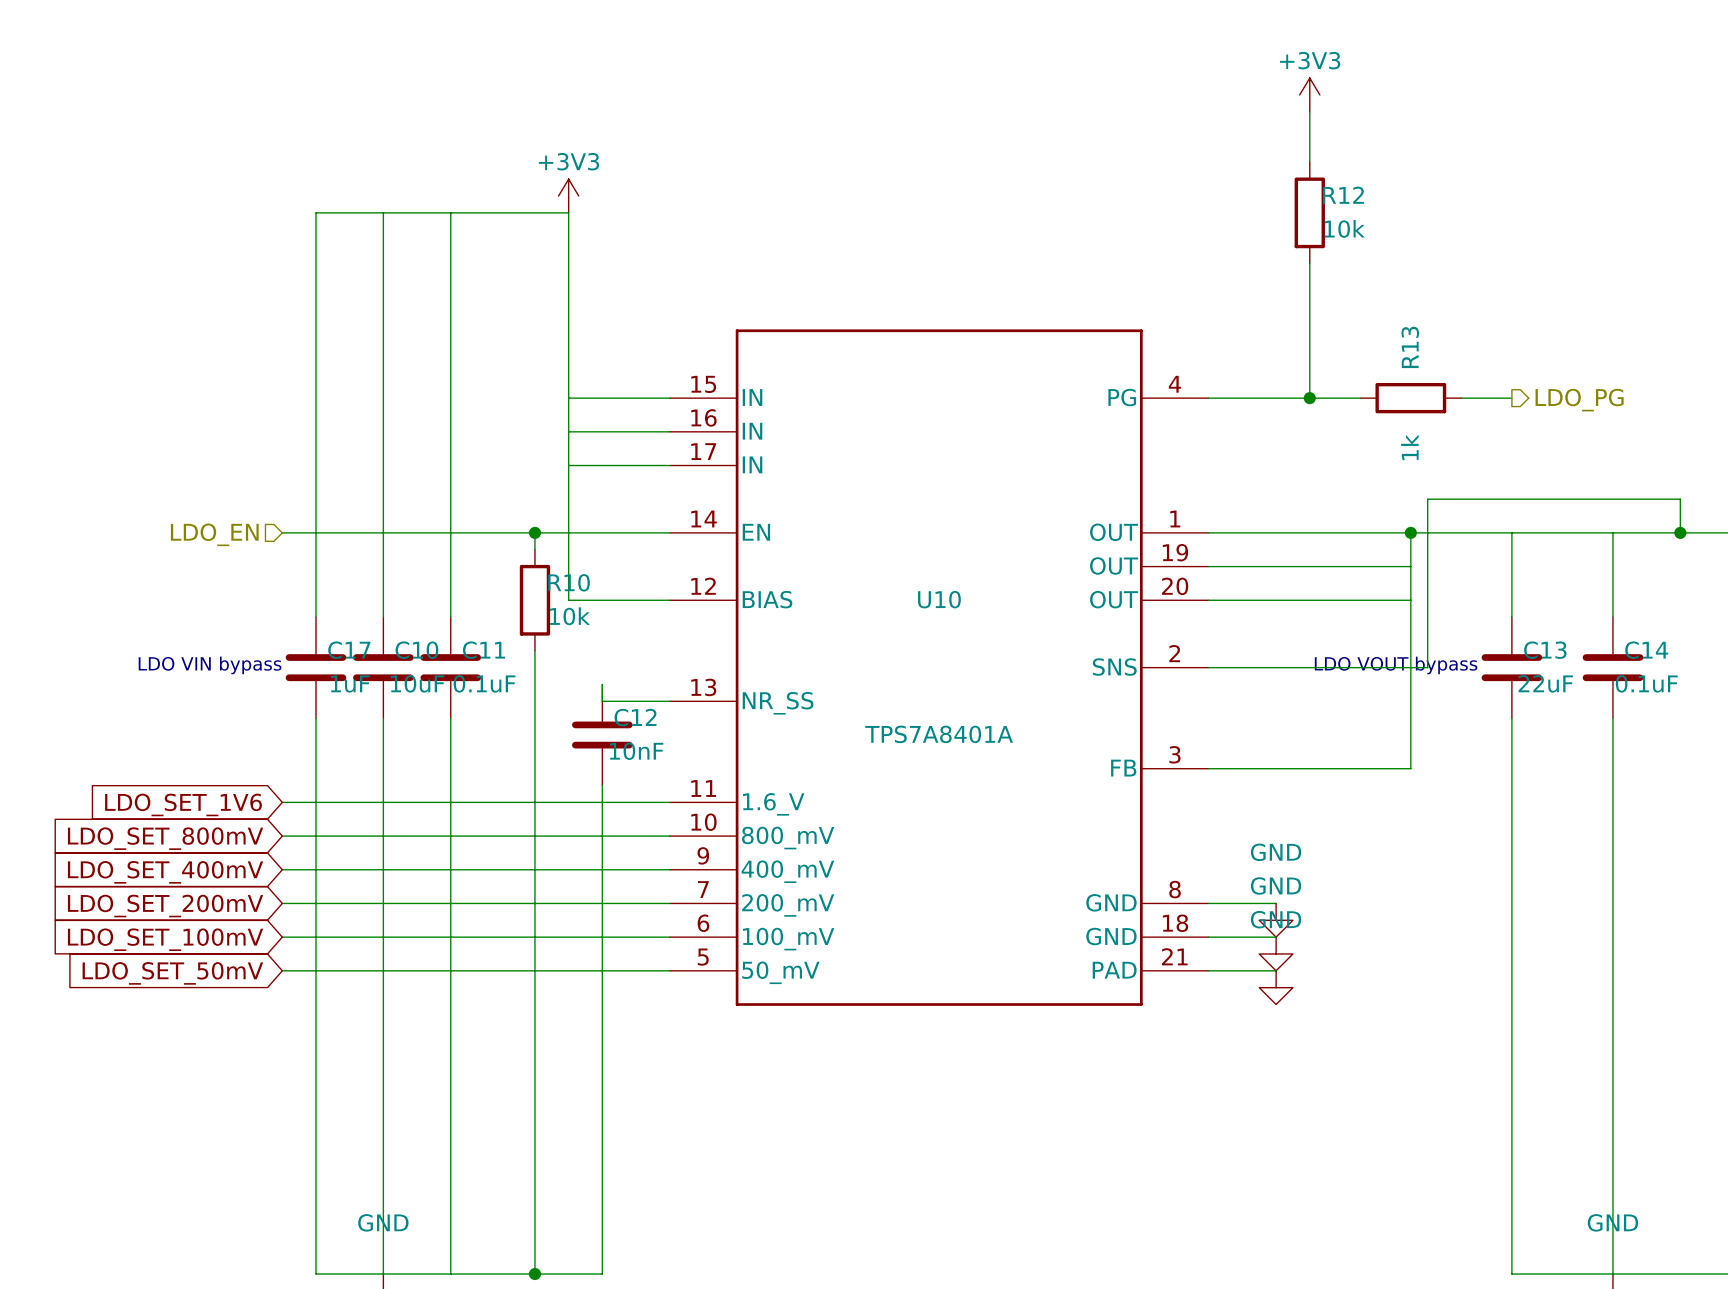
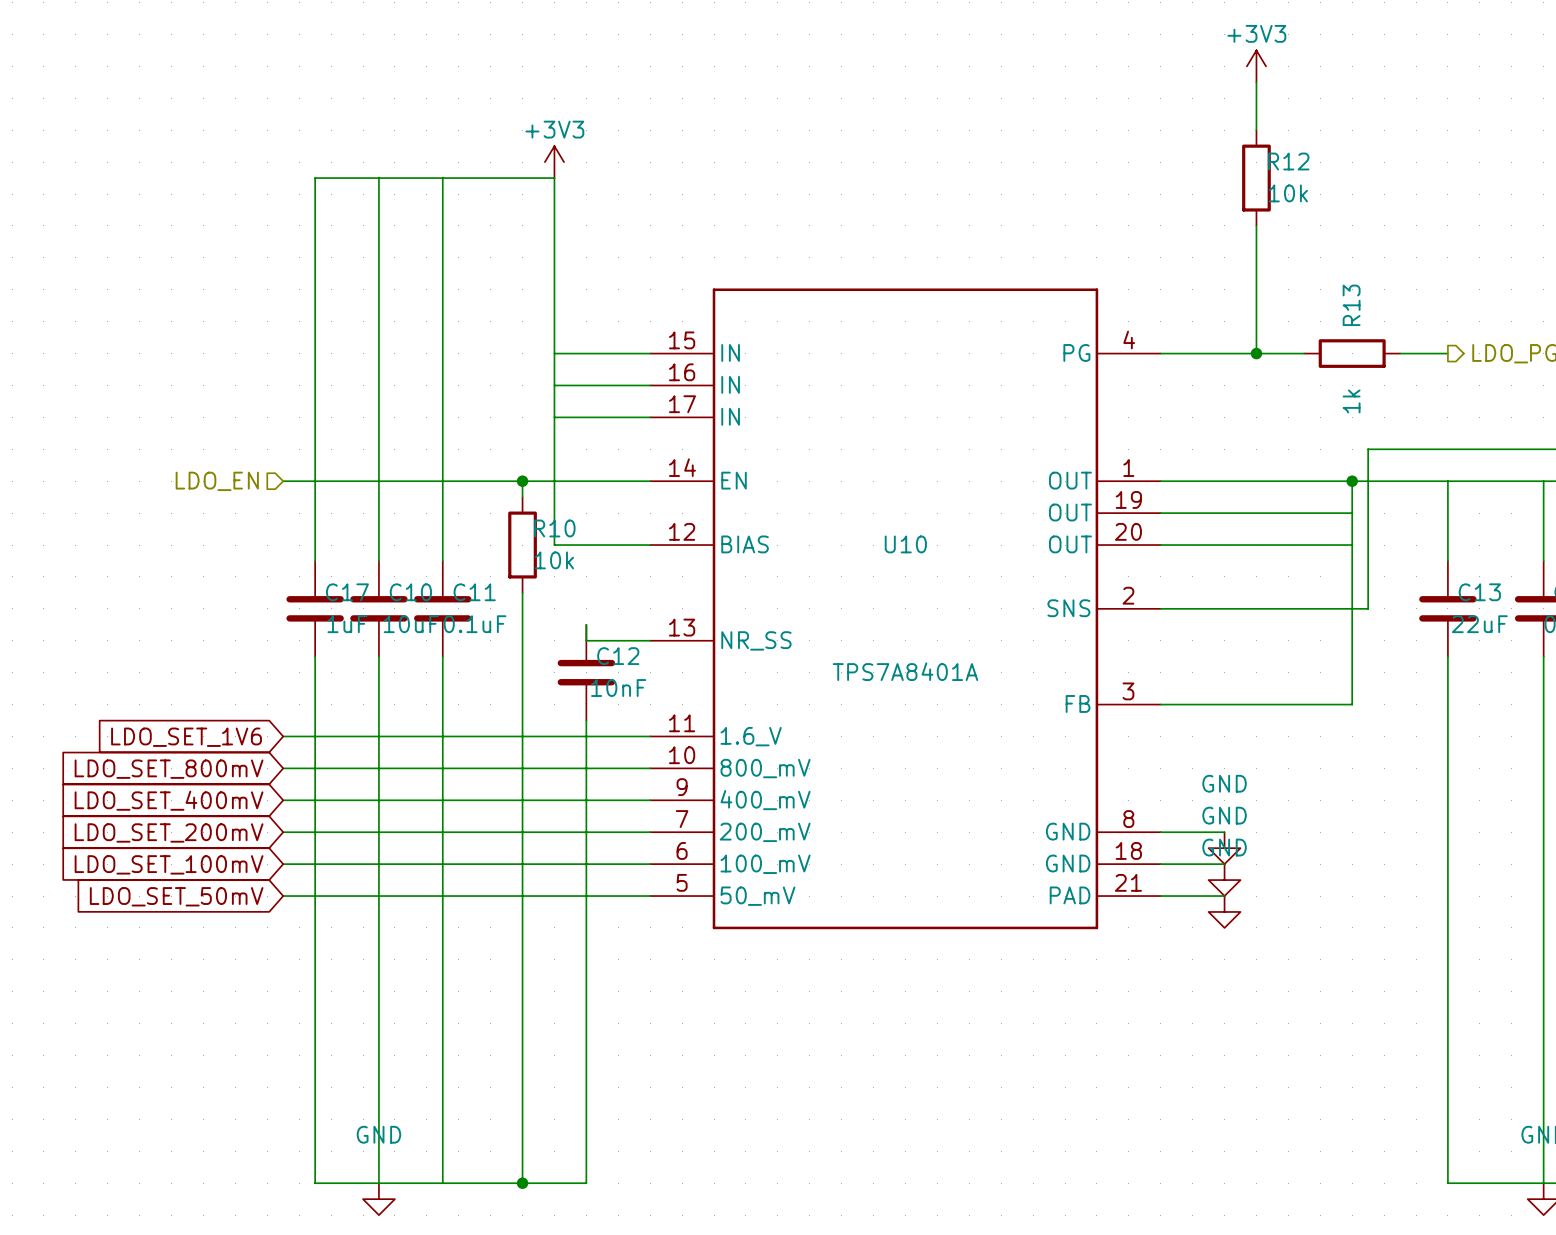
text: LDO VIN bypass (210, 665) -> none
text: LDO VOUT bypass (1396, 665) -> none

